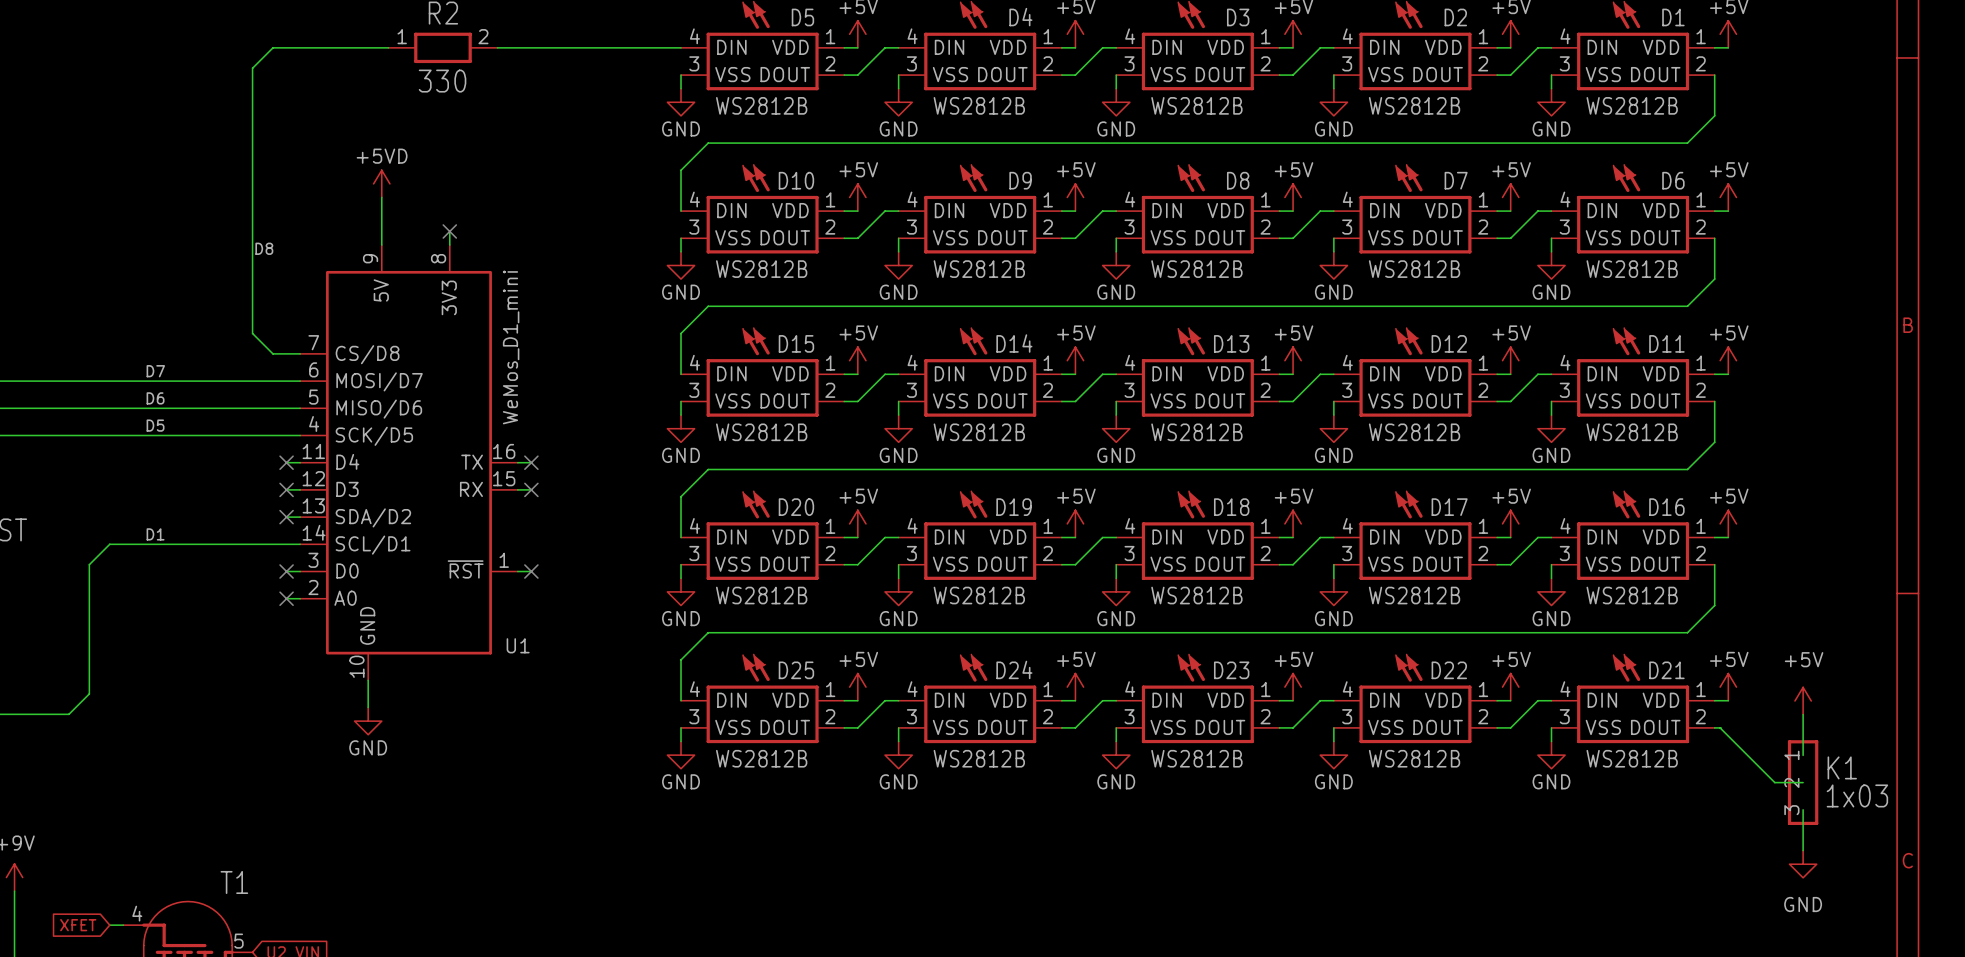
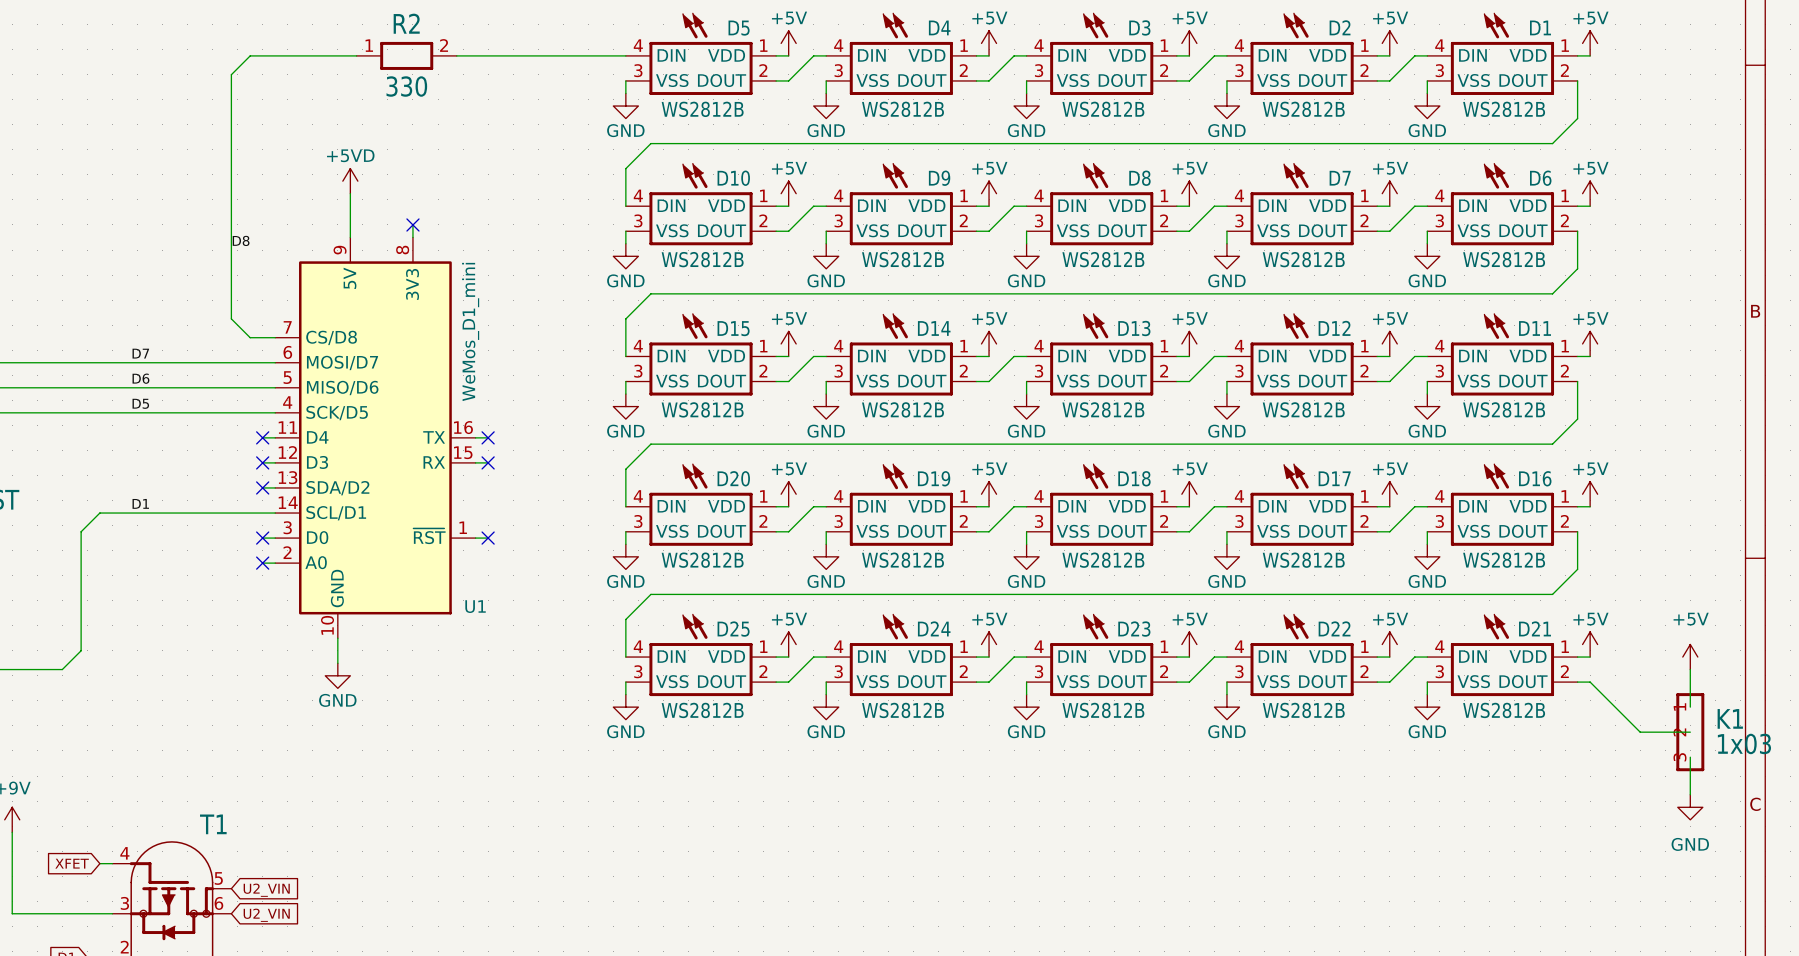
power symbol position: +5V (1803, 701) -> +5V (1690, 657)
wire: (1803, 714) (1803, 755) -> (1690, 669) (1690, 707)
wire: (1720, 727) (1774, 782) (1803, 782) -> (1583, 682) (1590, 682) (1640, 732) (1690, 732)
K1 name position: K1 (1842, 767) -> K1 (1730, 718)
K1 position: (1803, 782) -> (1690, 732)
K1 value position: 1x03 (1857, 795) -> 1x03 (1744, 743)
wire: (1803, 809) (1803, 850) -> (1690, 757) (1690, 794)
power symbol position: GND (1803, 864) -> GND (1690, 807)

